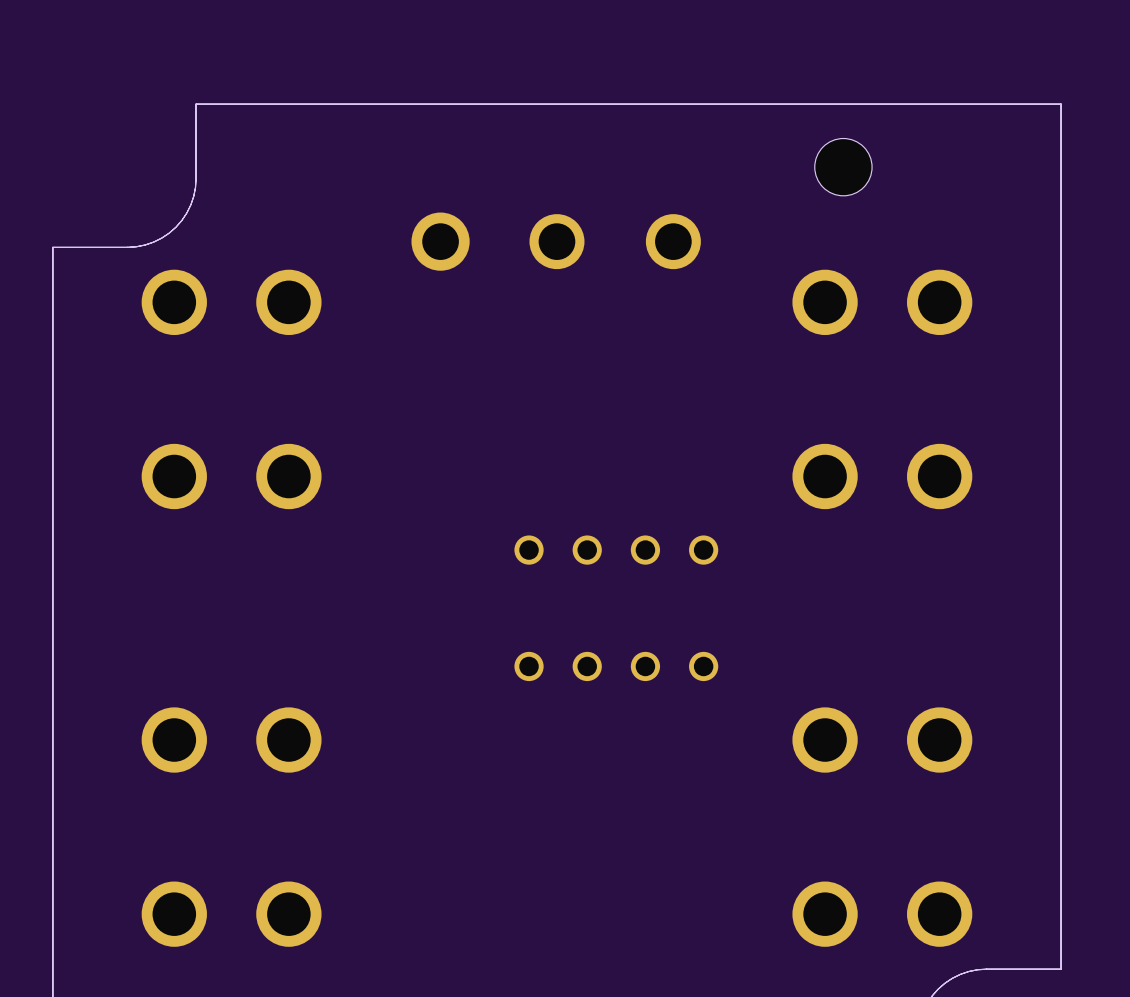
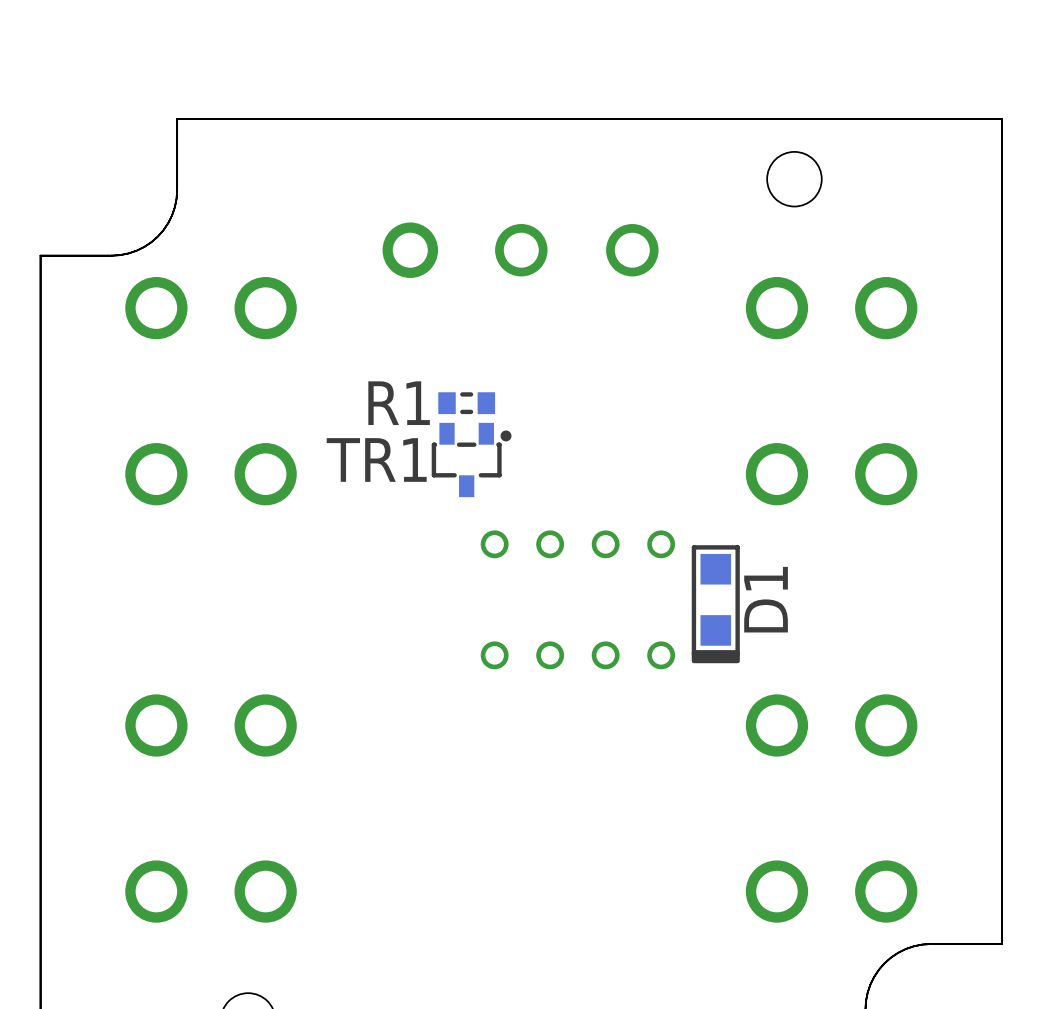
R1: none -> (466, 403)
TR1: none -> (471, 459)
D1: none -> (715, 604)

